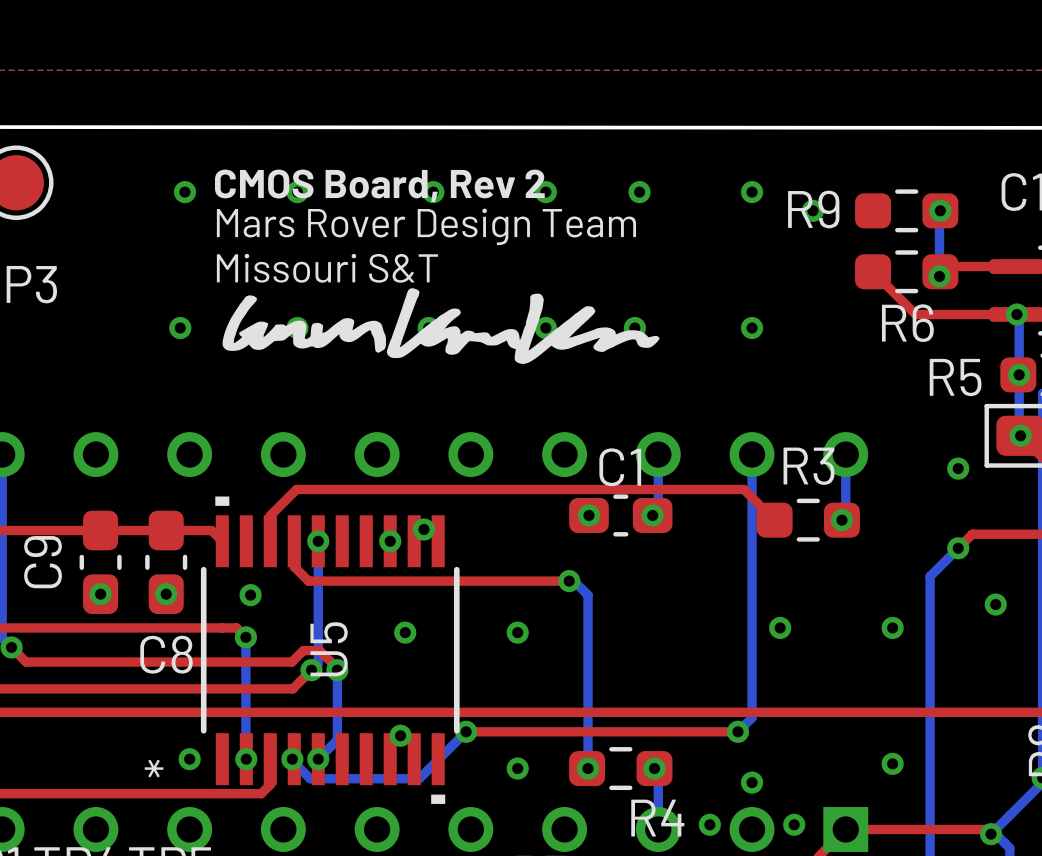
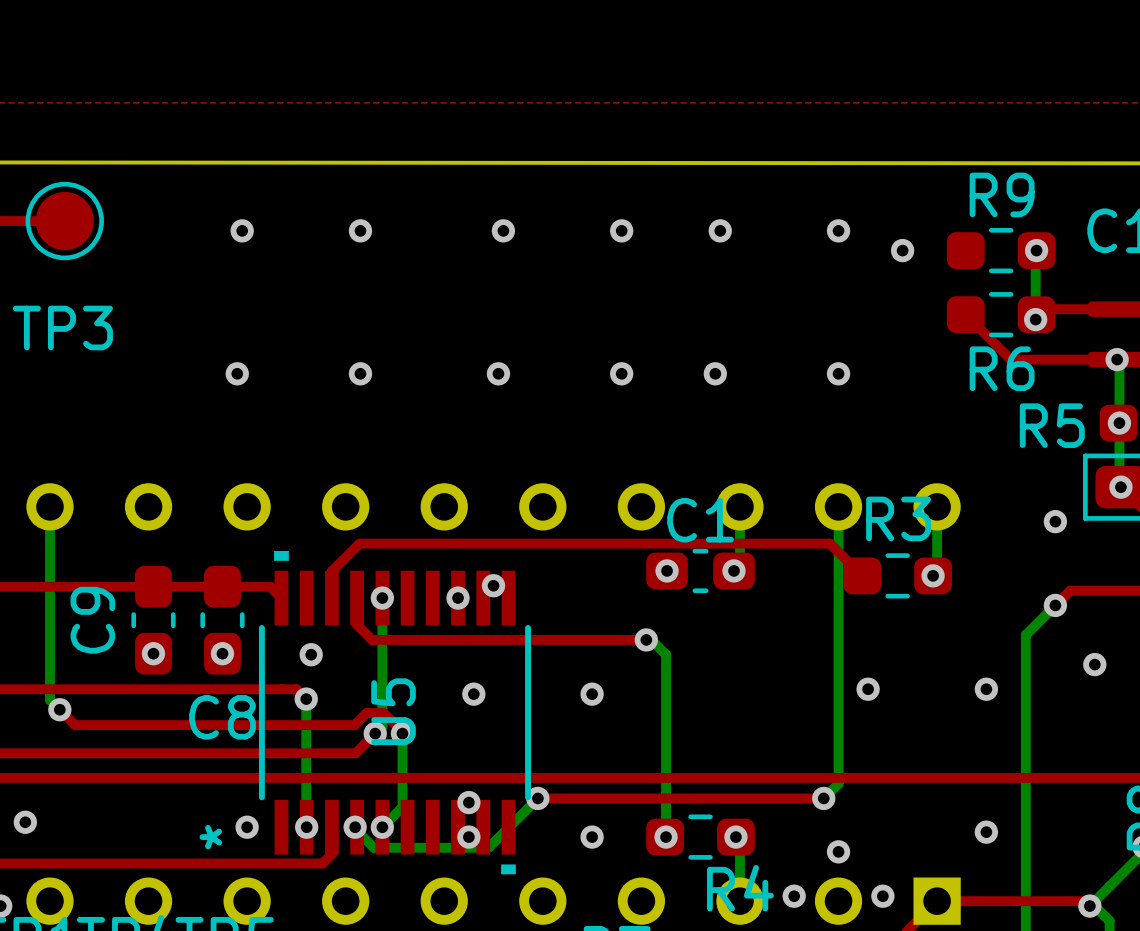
text: CMOS Board, Rev 2 (379, 185) -> none
R9 name position: R9 (813, 209) -> R9 (1002, 194)
text: Mars Rover Design Team (426, 226) -> none
text: Missouri S&T (327, 268) -> none
drawing: [222, 288, 660, 364] -> none
via: none -> (468, 837)

